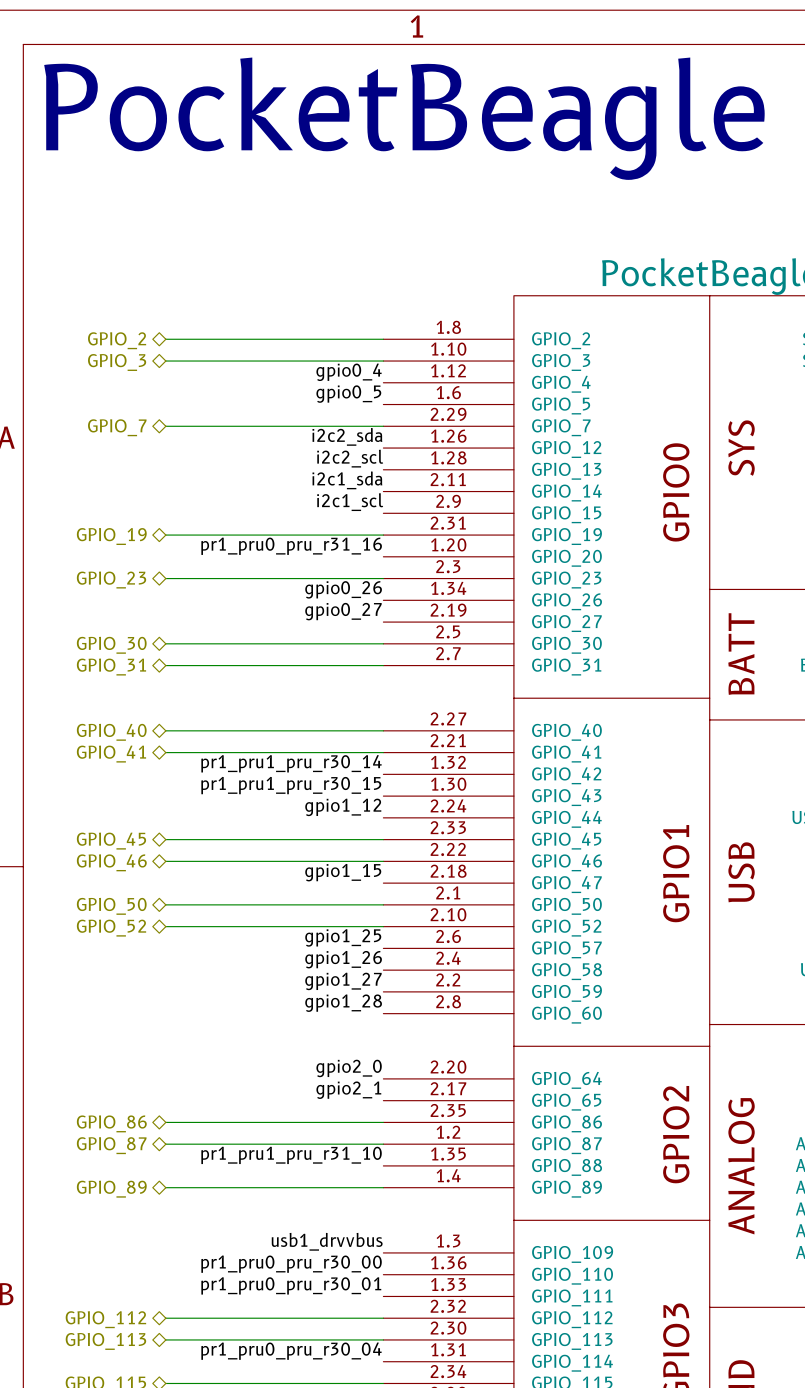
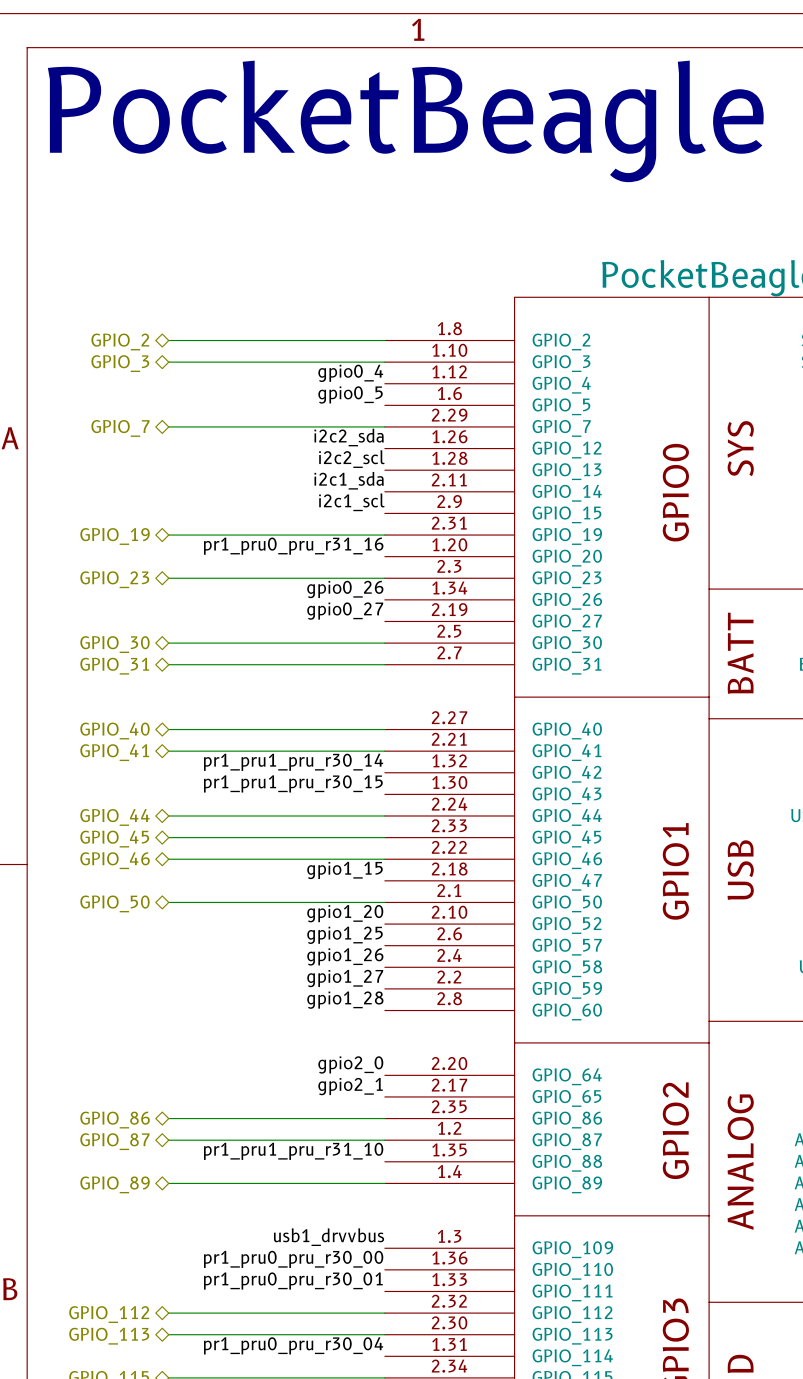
label: gpio1_12 (343, 807) -> none
hierarchical label: none -> GPIO_44 (114, 817)
label: none -> gpio1_20 (345, 913)
wire: (165, 926) (383, 926) -> (168, 816) (384, 816)
hierarchical label: GPIO_52 (111, 928) -> none

